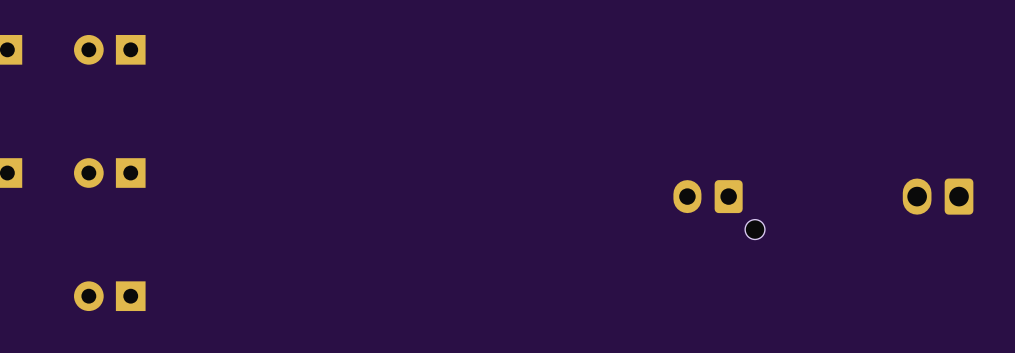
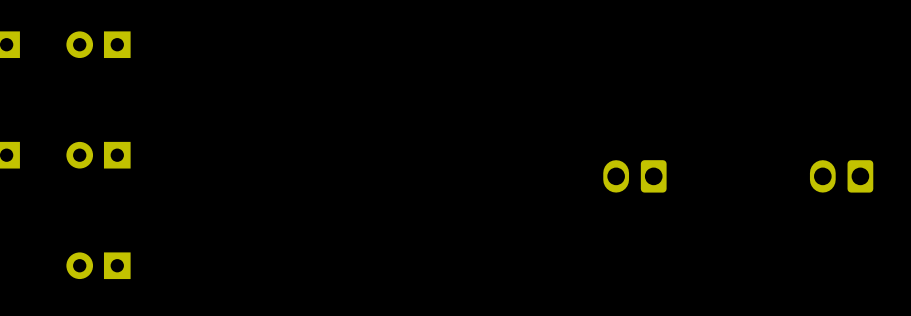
part: none -> (634, 176)
part: (719, 209) -> none

